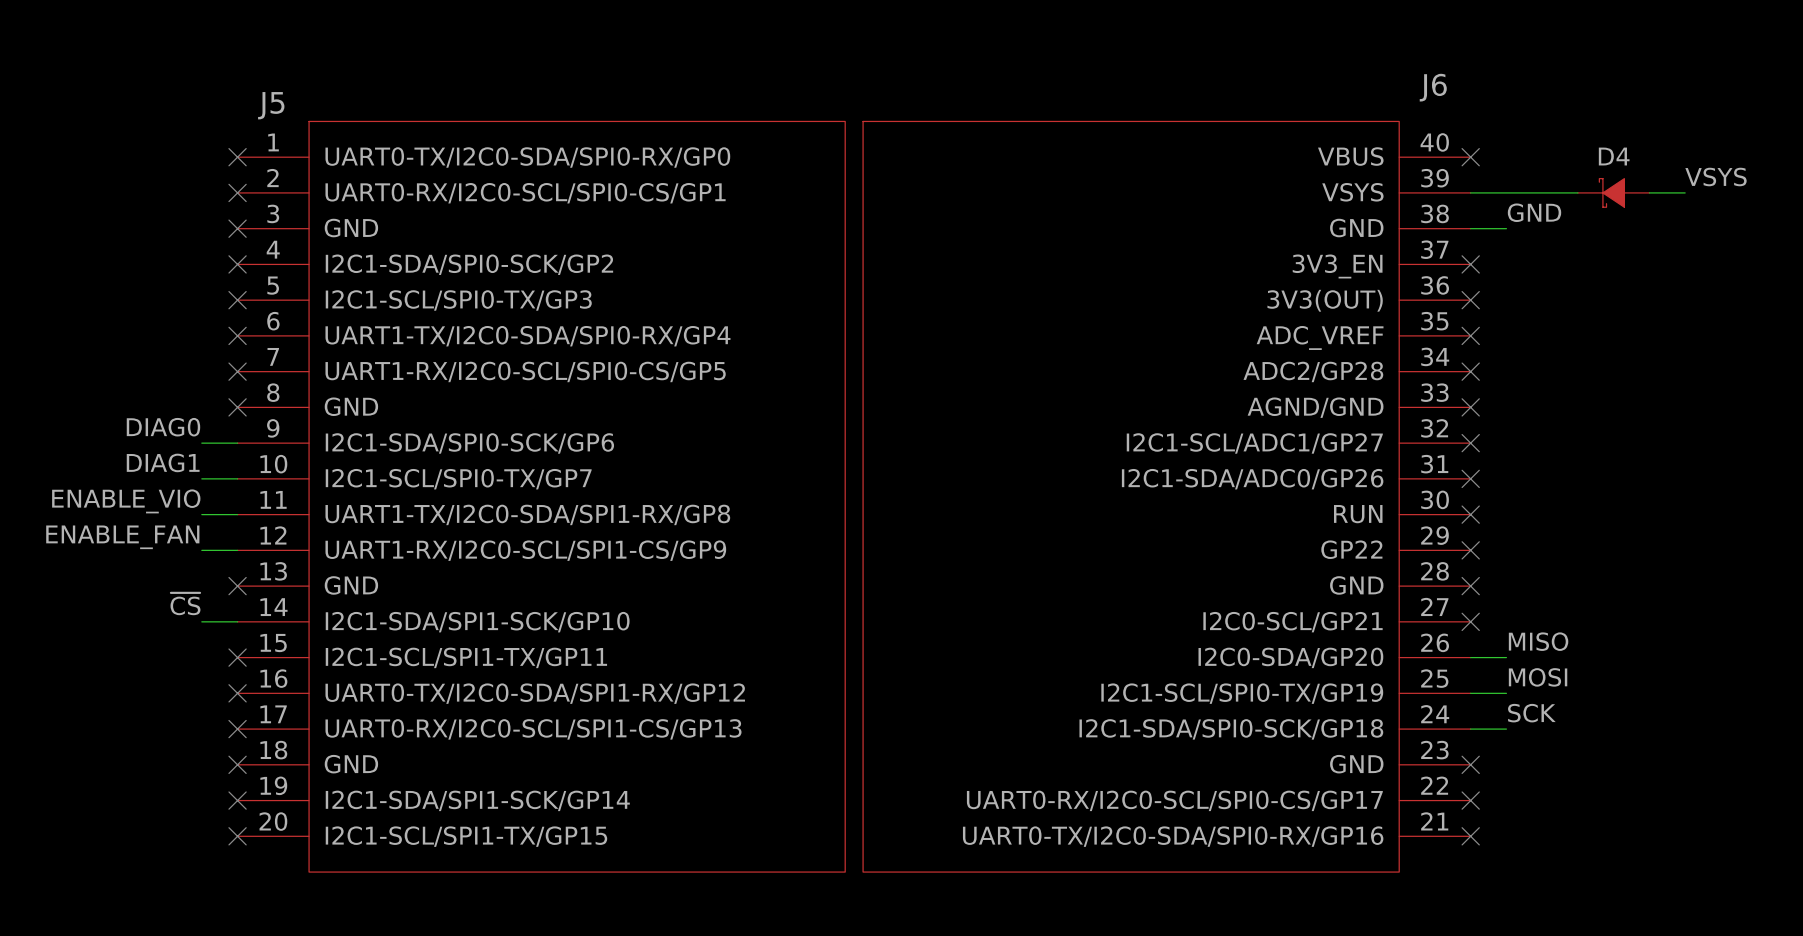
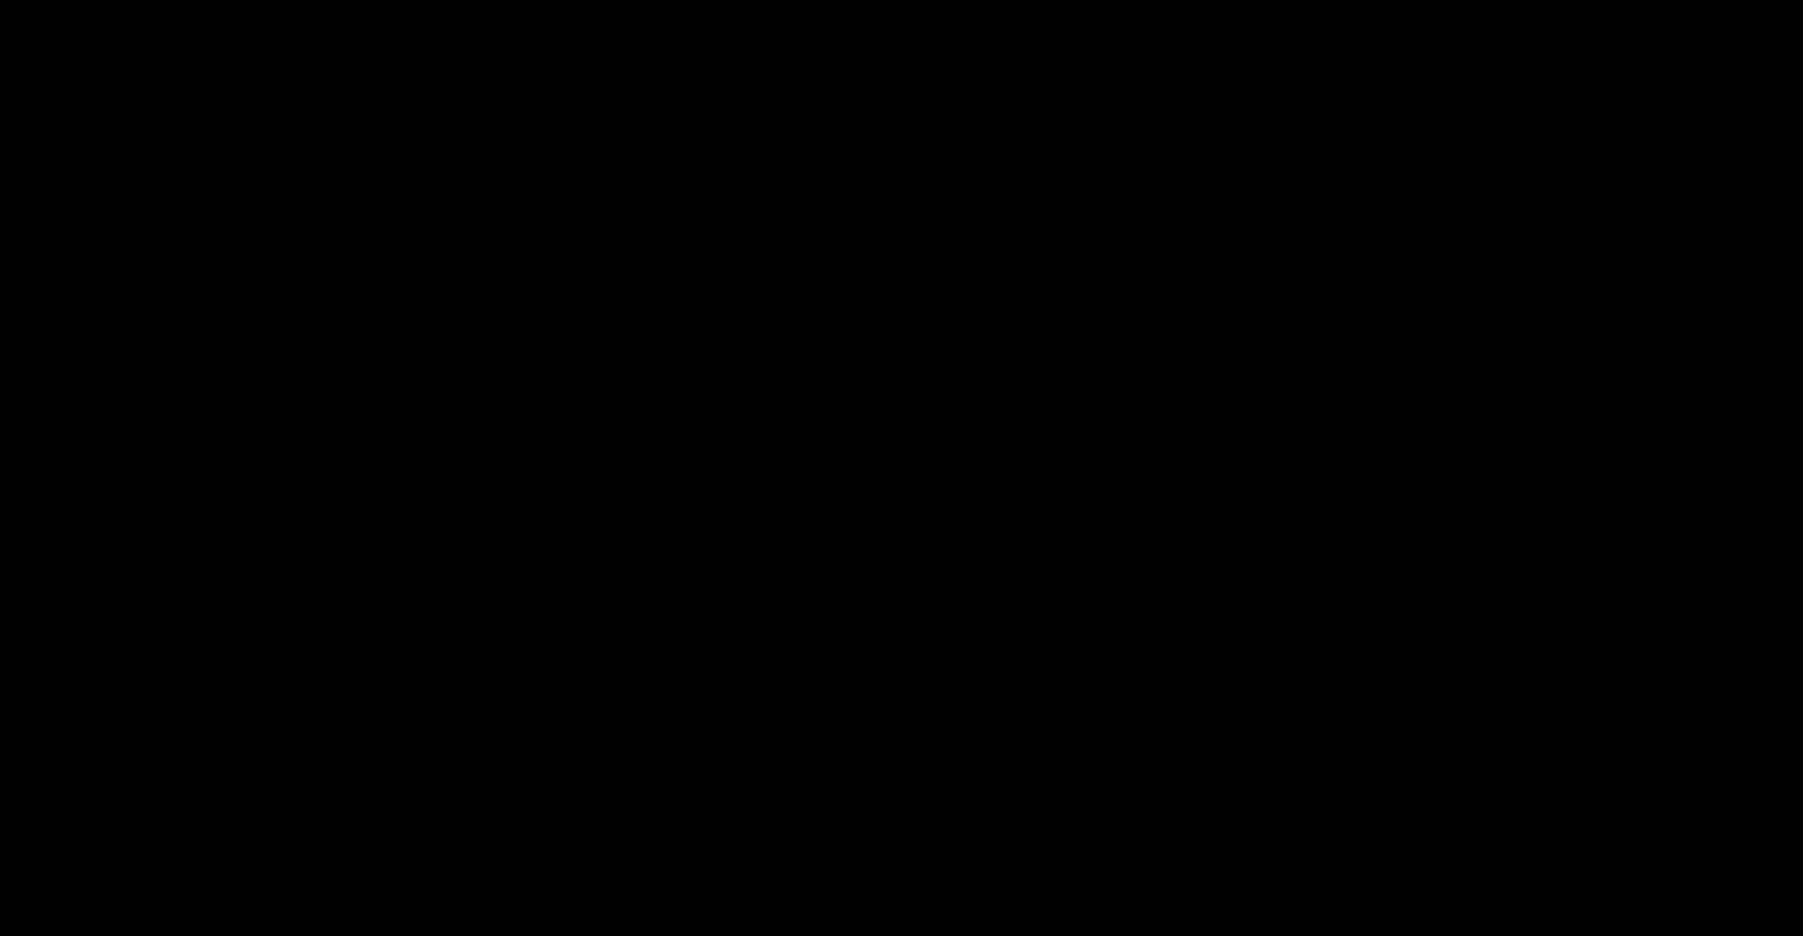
no-connect mark: (237, 157) -> none
no-connect mark: (1470, 157) -> none
label: VSYS (1715, 177) -> none
no-connect mark: (237, 192) -> none
wire: (1470, 192) (1577, 192) -> none
D4: (1613, 192) -> none
wire: (1649, 192) (1685, 192) -> none
label: GND (1534, 212) -> none
no-connect mark: (237, 228) -> none
wire: (1470, 228) (1506, 228) -> none
no-connect mark: (237, 264) -> none
no-connect mark: (1470, 264) -> none
no-connect mark: (237, 300) -> none
no-connect mark: (1470, 300) -> none
no-connect mark: (237, 335) -> none
no-connect mark: (1470, 335) -> none
no-connect mark: (237, 371) -> none
no-connect mark: (1470, 371) -> none
no-connect mark: (237, 407) -> none
no-connect mark: (1470, 407) -> none
label: DIAG0 (163, 427) -> none
wire: (201, 443) (237, 443) -> none
no-connect mark: (1470, 443) -> none
label: DIAG1 (163, 462) -> none
wire: (201, 478) (237, 478) -> none
no-connect mark: (1470, 478) -> none
J5: (541, 496) -> none
J6: (1166, 496) -> none
label: ENABLE_VIO (126, 501) -> none
wire: (201, 514) (237, 514) -> none
no-connect mark: (1470, 514) -> none
label: ENABLE_FAN (122, 537) -> none
wire: (201, 550) (237, 550) -> none
no-connect mark: (1470, 550) -> none
no-connect mark: (237, 586) -> none
no-connect mark: (1470, 586) -> none
label: ~{CS} (185, 604) -> none
wire: (201, 621) (237, 621) -> none
no-connect mark: (1470, 621) -> none
label: MISO (1538, 641) -> none
no-connect mark: (237, 657) -> none
wire: (1470, 657) (1506, 657) -> none
label: MOSI (1538, 677) -> none
no-connect mark: (237, 693) -> none
wire: (1470, 693) (1506, 693) -> none
label: SCK (1531, 713) -> none
no-connect mark: (237, 729) -> none
wire: (1470, 729) (1506, 729) -> none
no-connect mark: (237, 764) -> none
no-connect mark: (1470, 764) -> none
no-connect mark: (237, 800) -> none
no-connect mark: (1470, 800) -> none
no-connect mark: (237, 836) -> none
no-connect mark: (1470, 836) -> none

